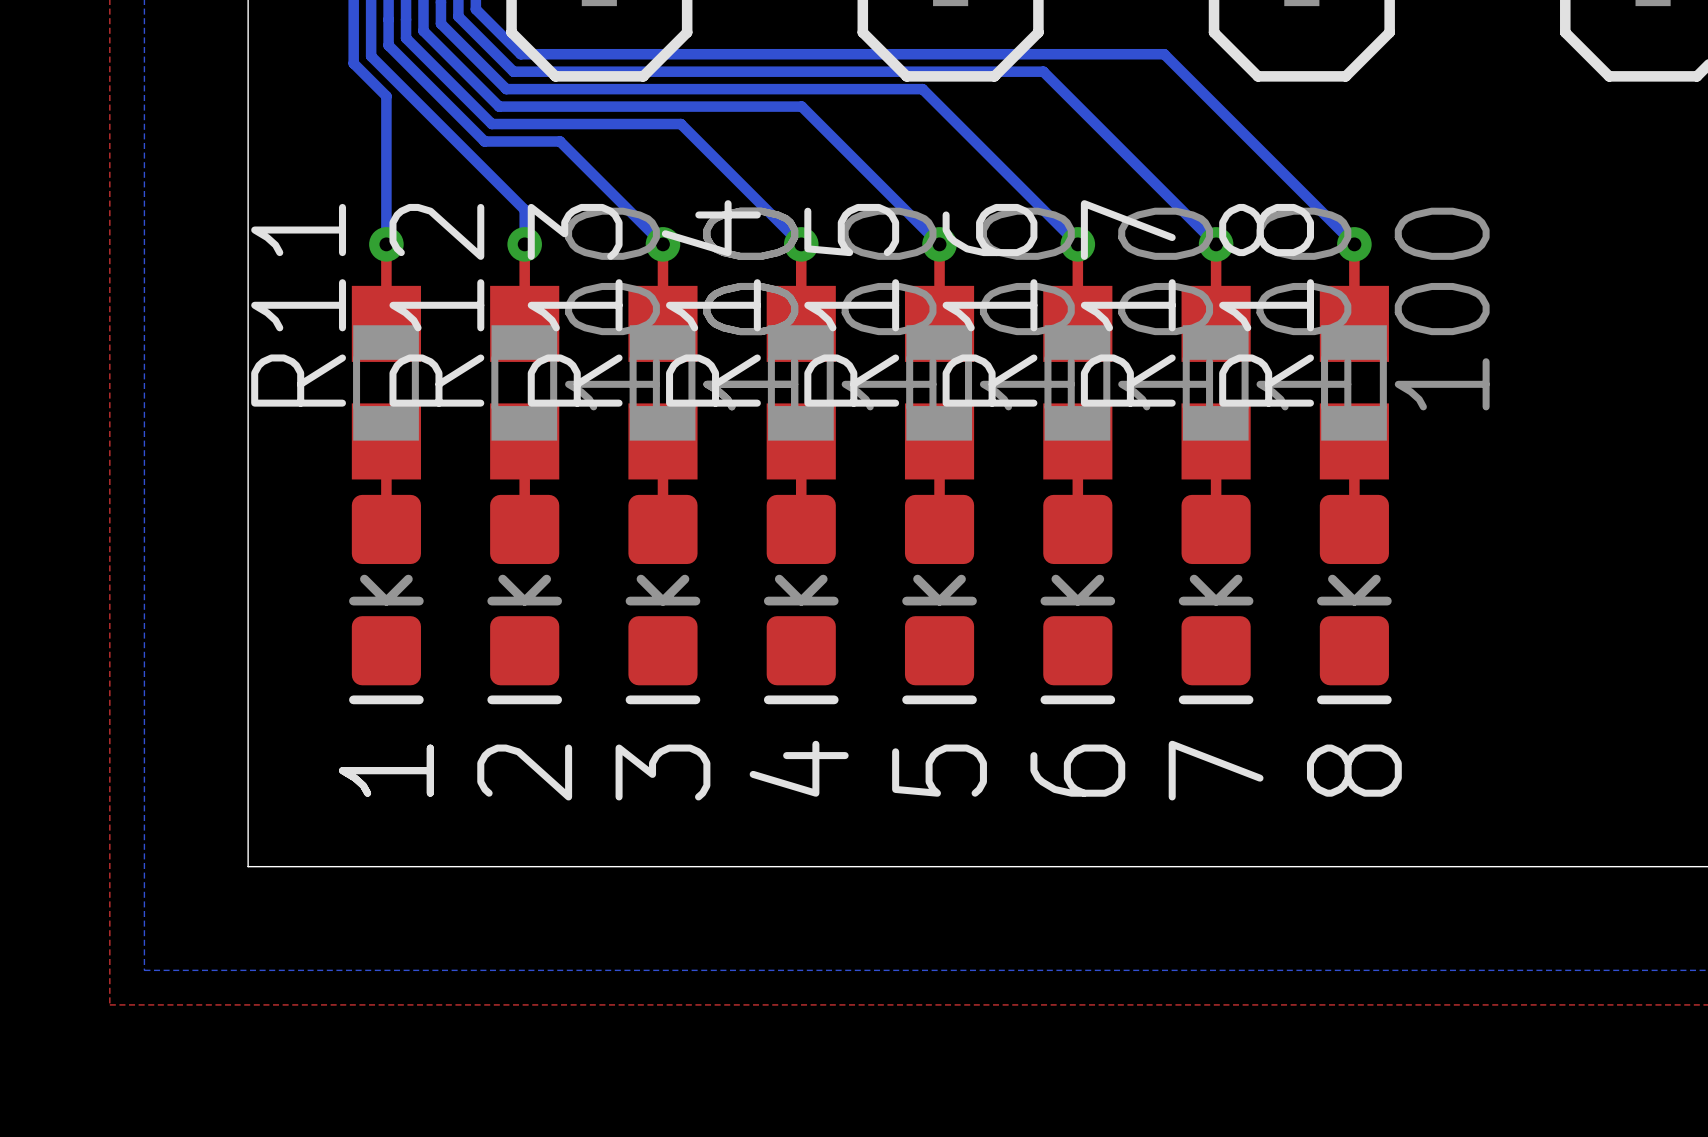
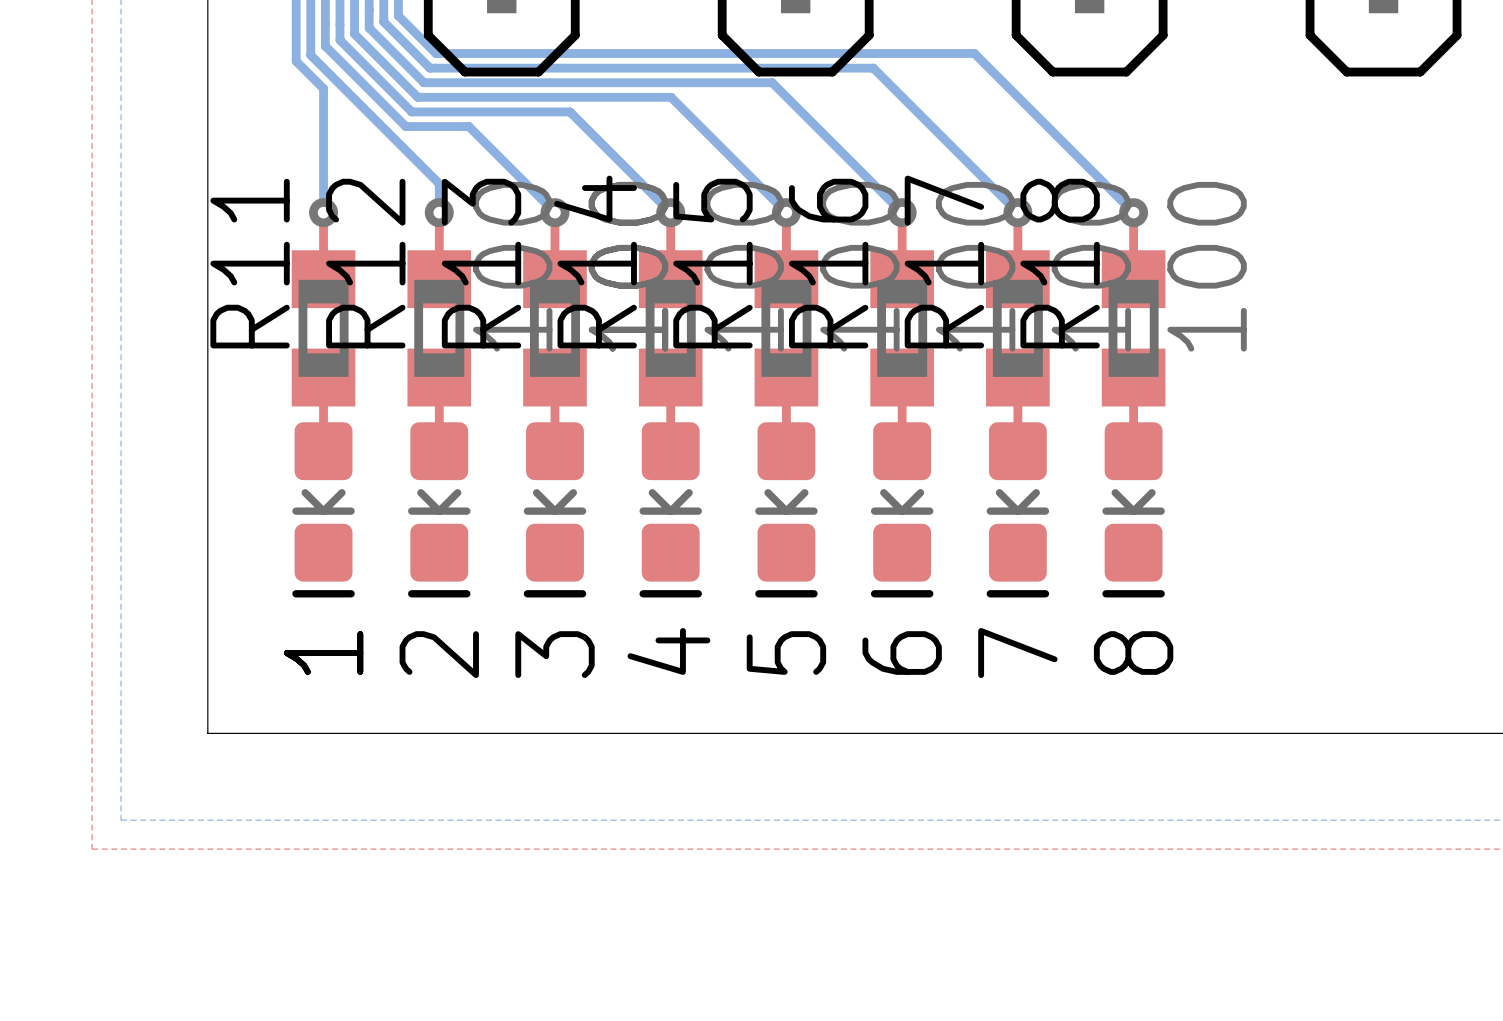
R11 footprint: [351, 285, 421, 480] -> [291, 250, 356, 407]
R12 footprint: [490, 285, 560, 480] -> [407, 250, 472, 407]
R13 footprint: [628, 285, 698, 480] -> [523, 250, 587, 407]
R14 footprint: [766, 285, 836, 480] -> [638, 250, 703, 407]
R15 footprint: [904, 285, 975, 480] -> [754, 250, 819, 407]
R16 footprint: [1043, 285, 1113, 480] -> [870, 250, 934, 407]
R17 footprint: [1181, 285, 1251, 480] -> [986, 250, 1050, 407]
R18 footprint: [1319, 285, 1389, 480] -> [1101, 250, 1166, 407]

